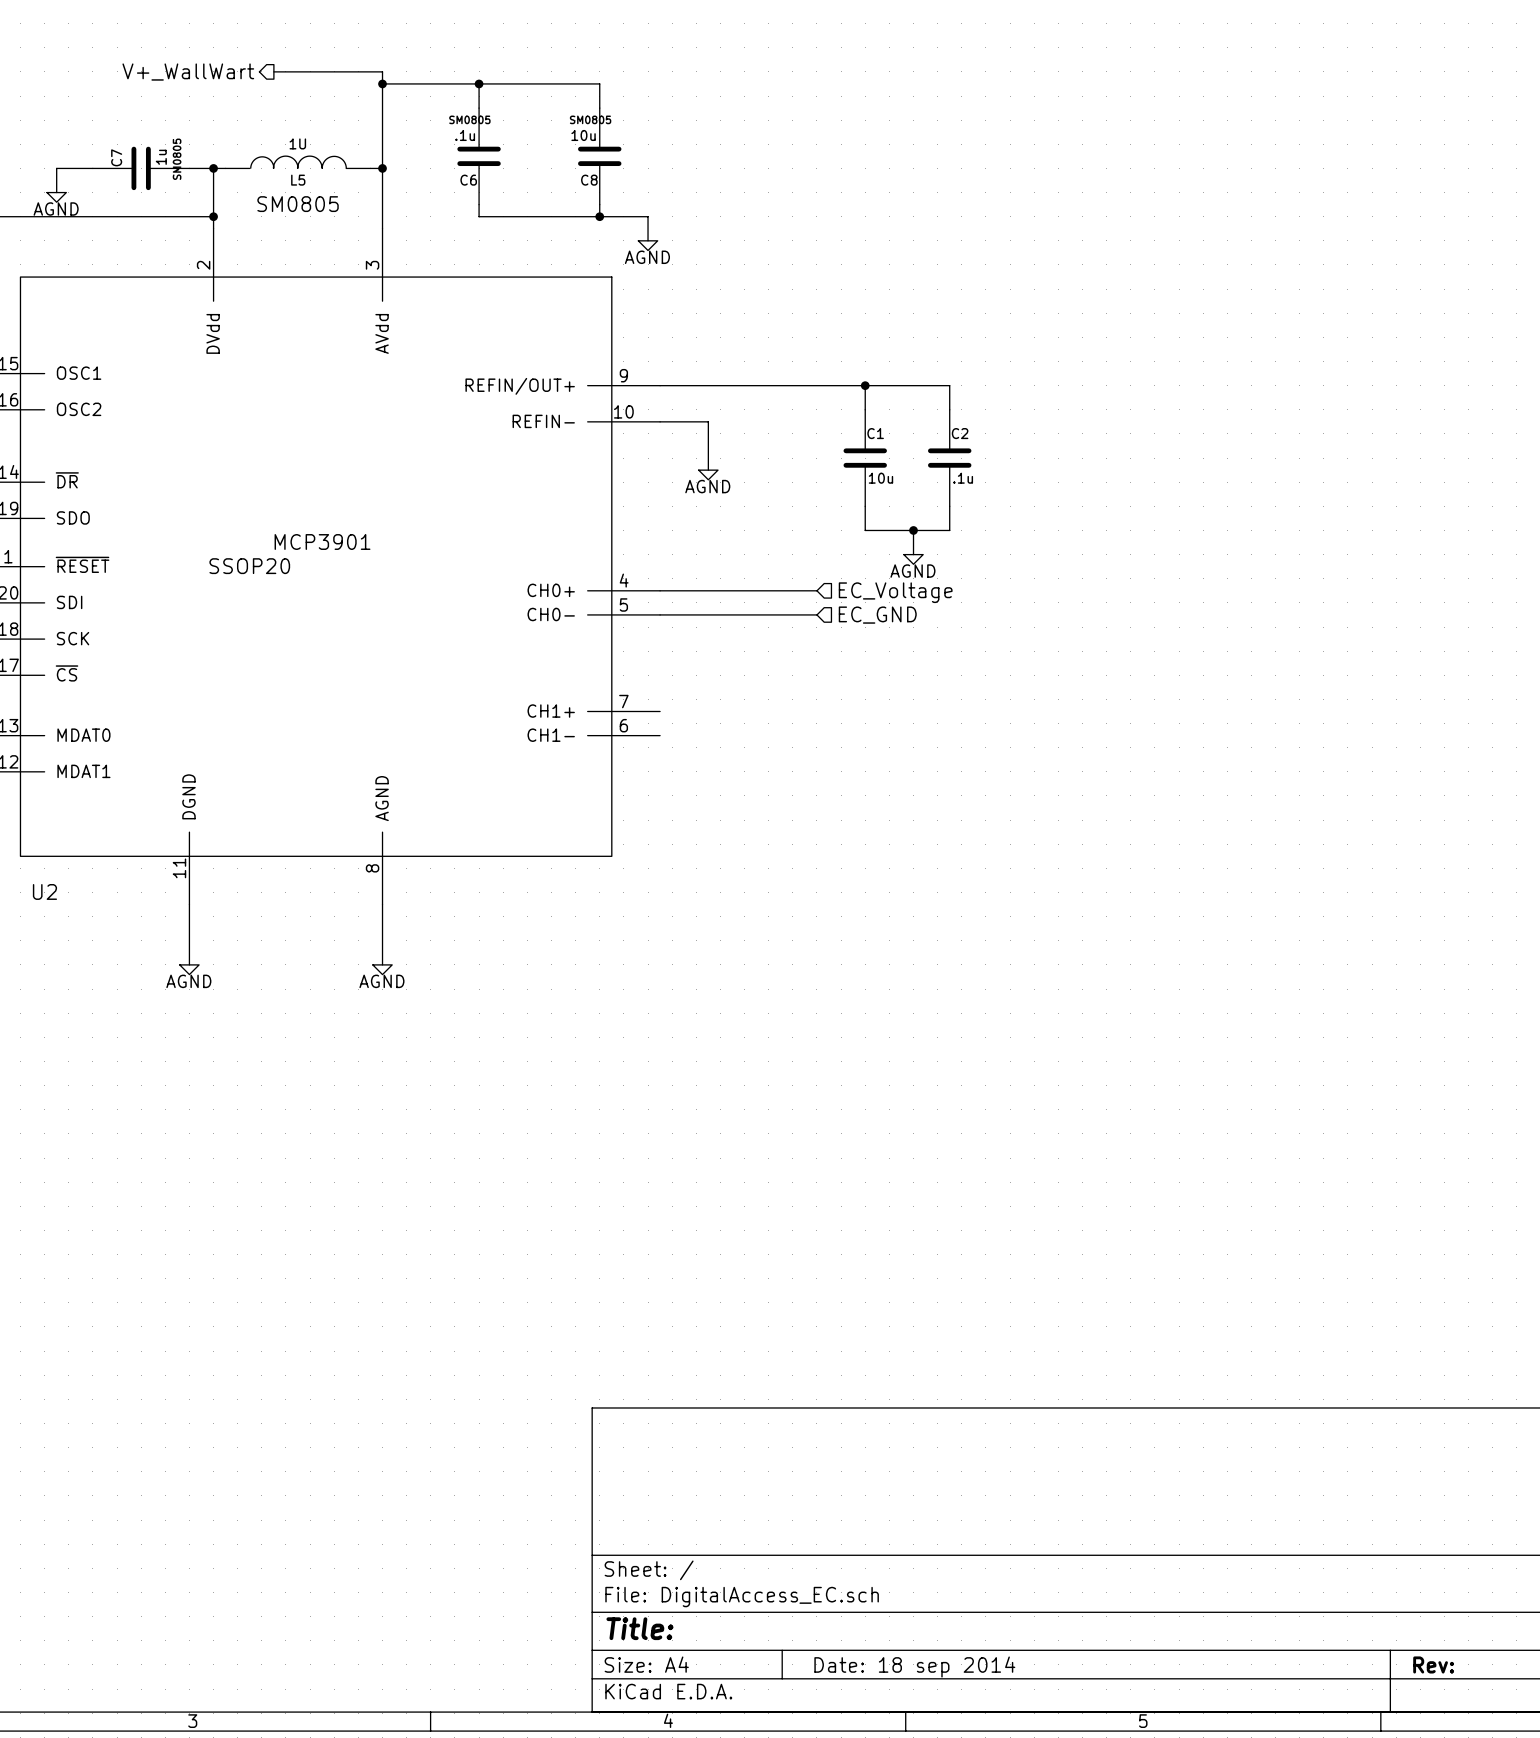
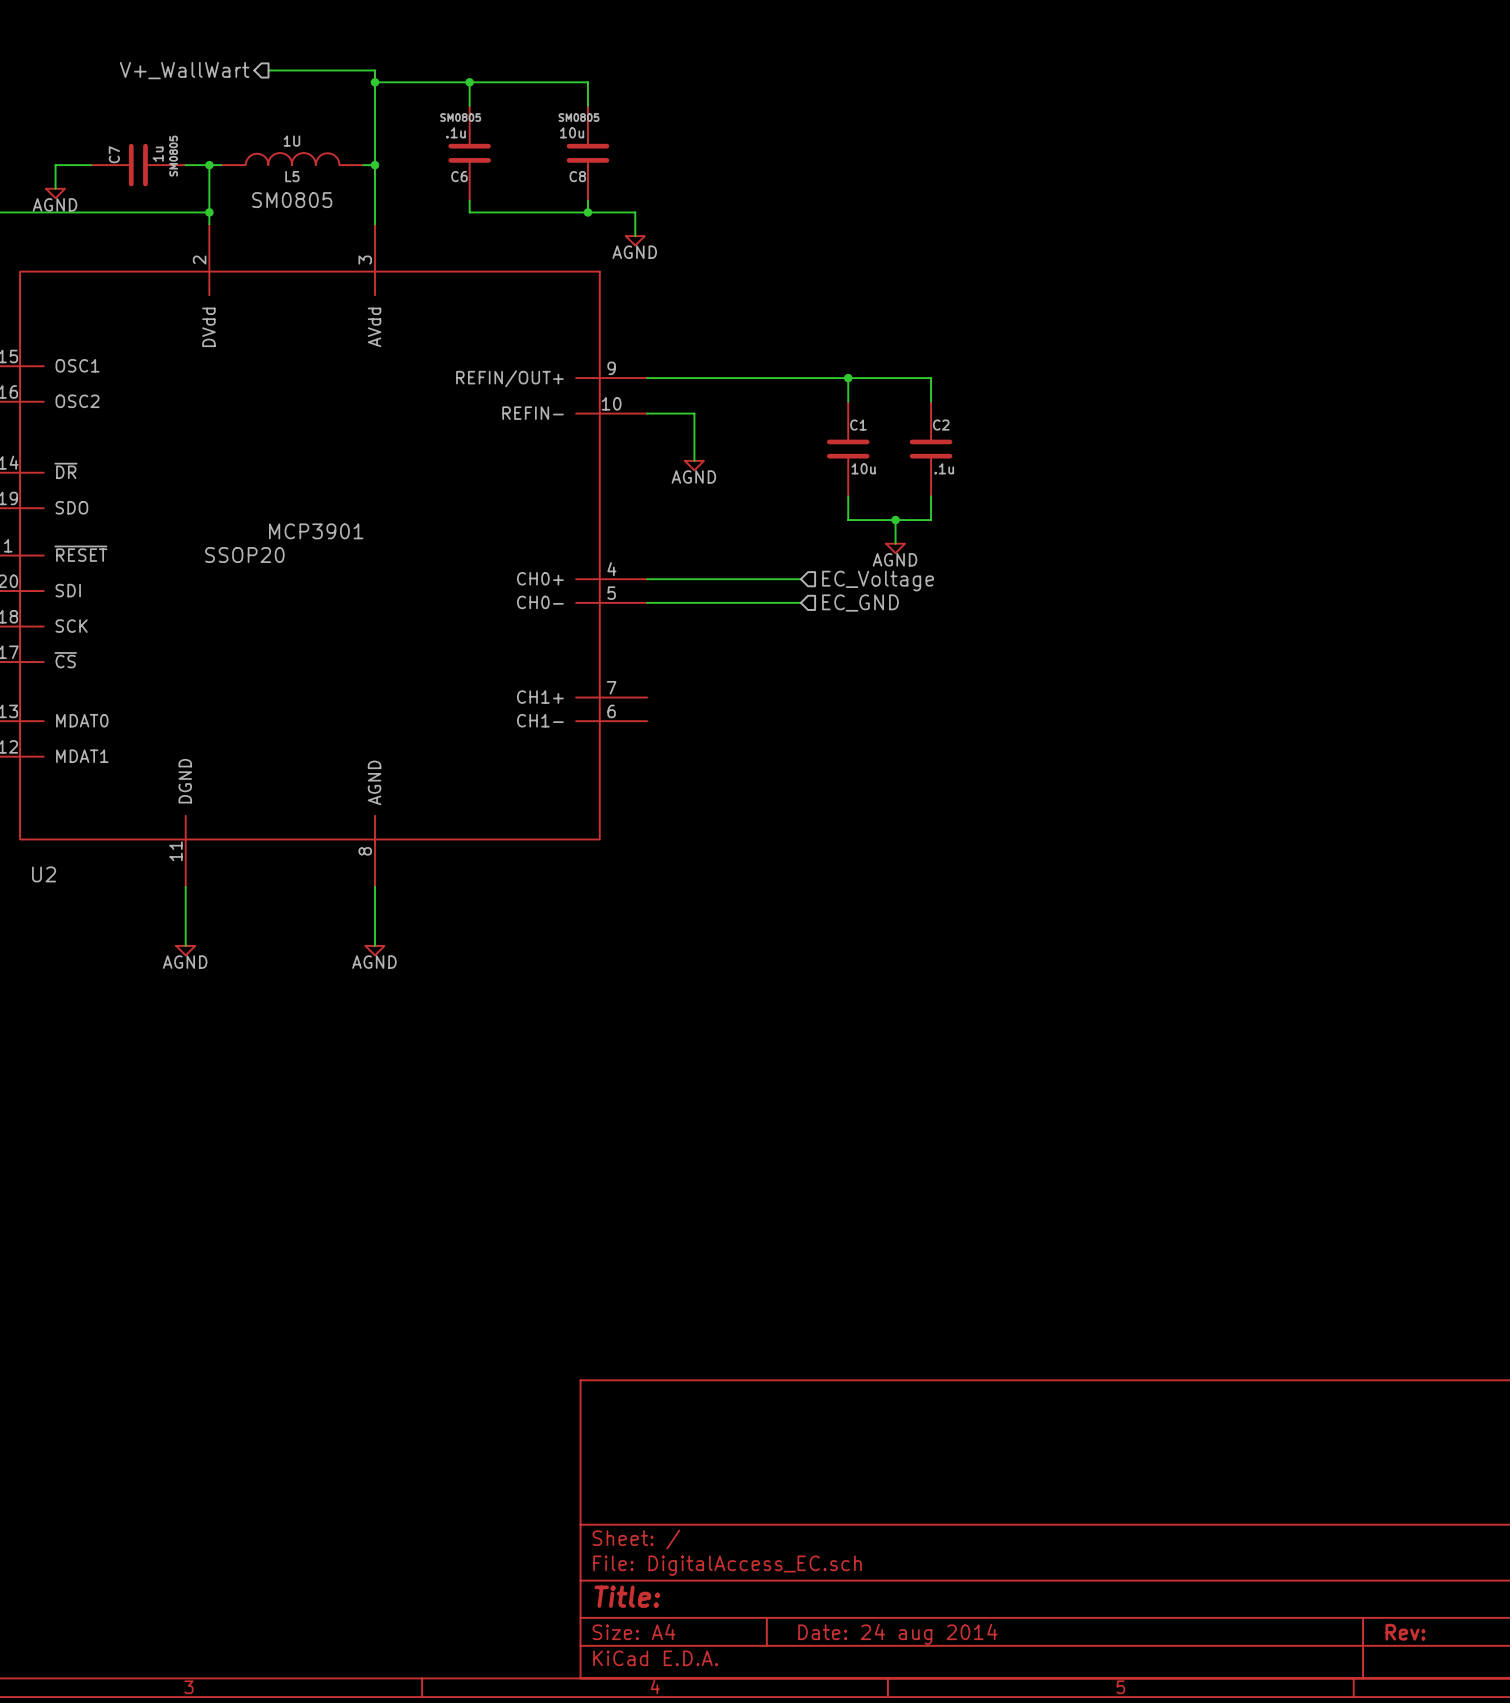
title block: Date: 18 sep 2014 (914, 1667) -> Date: 24 aug 2014 (897, 1634)

